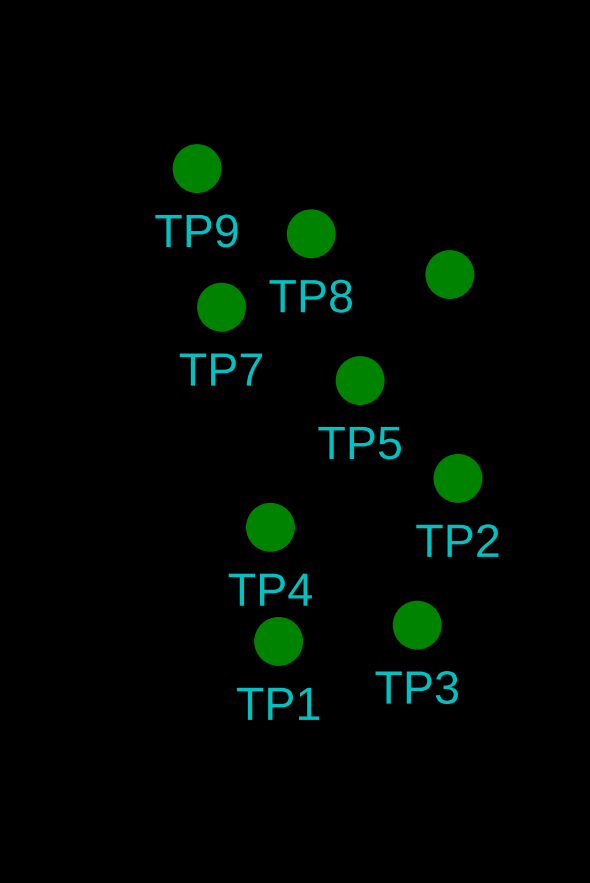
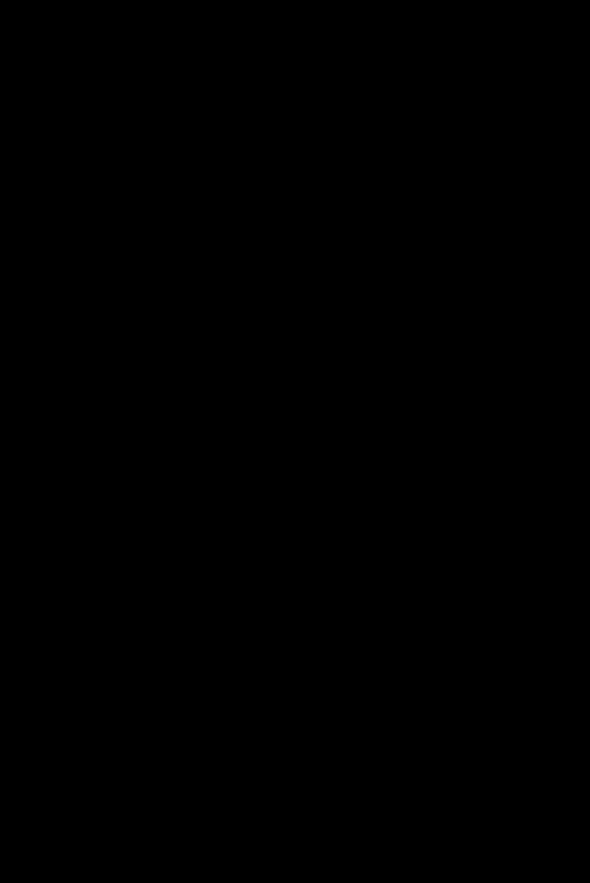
TP9: (197, 168) -> none
TP8: (311, 233) -> none
part: (449, 274) -> none
TP7: (221, 307) -> none
TP5: (360, 380) -> none
TP2: (457, 478) -> none
TP4: (270, 527) -> none
TP3: (417, 625) -> none
TP1: (278, 641) -> none

